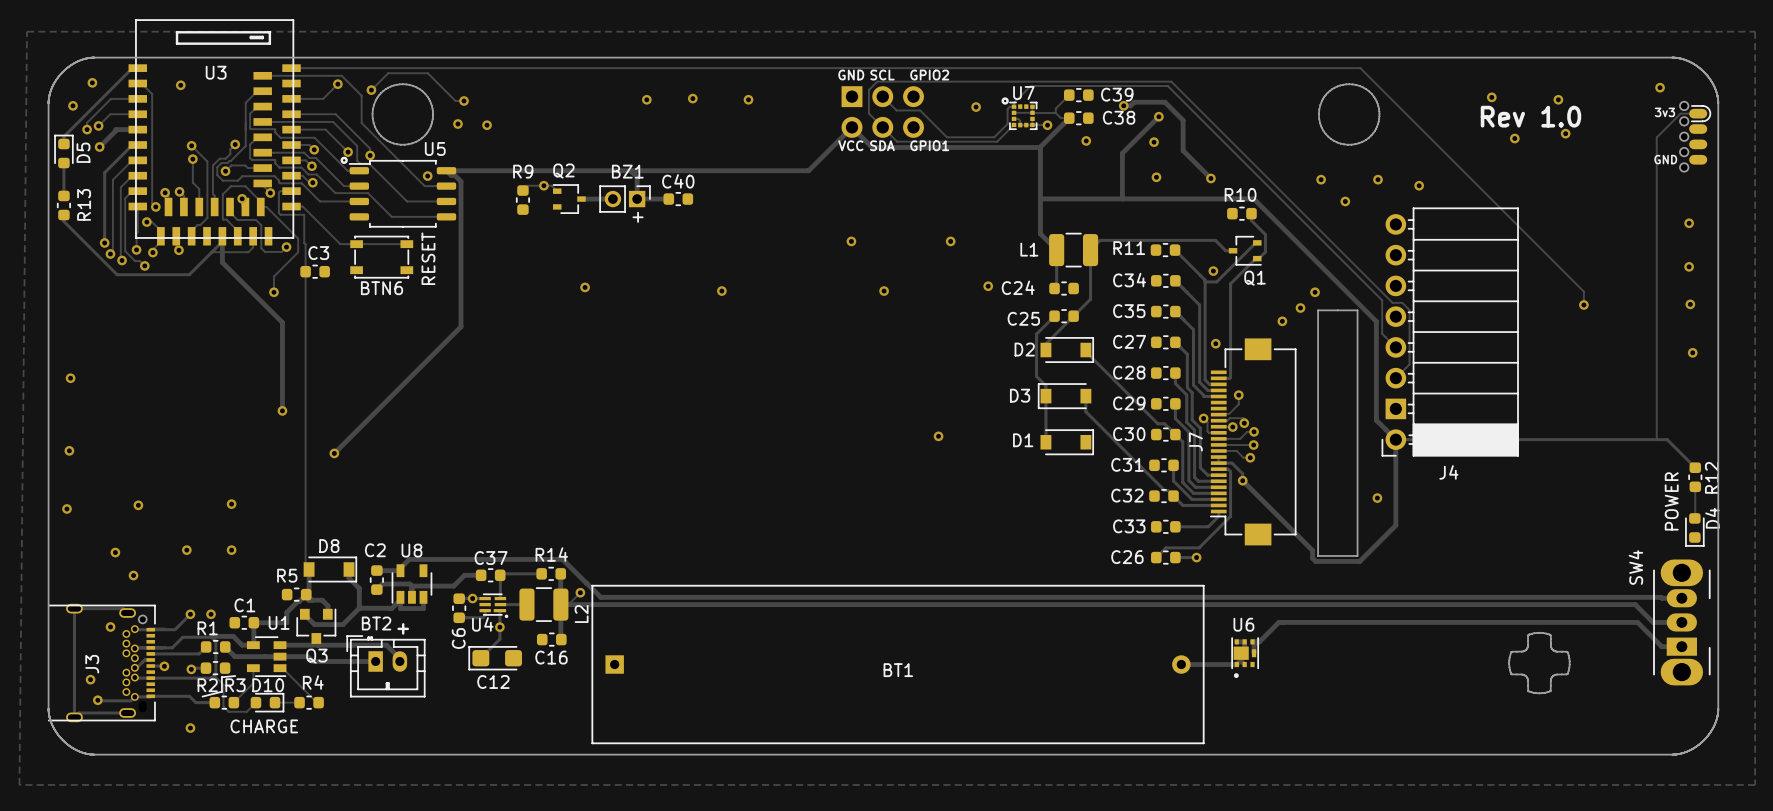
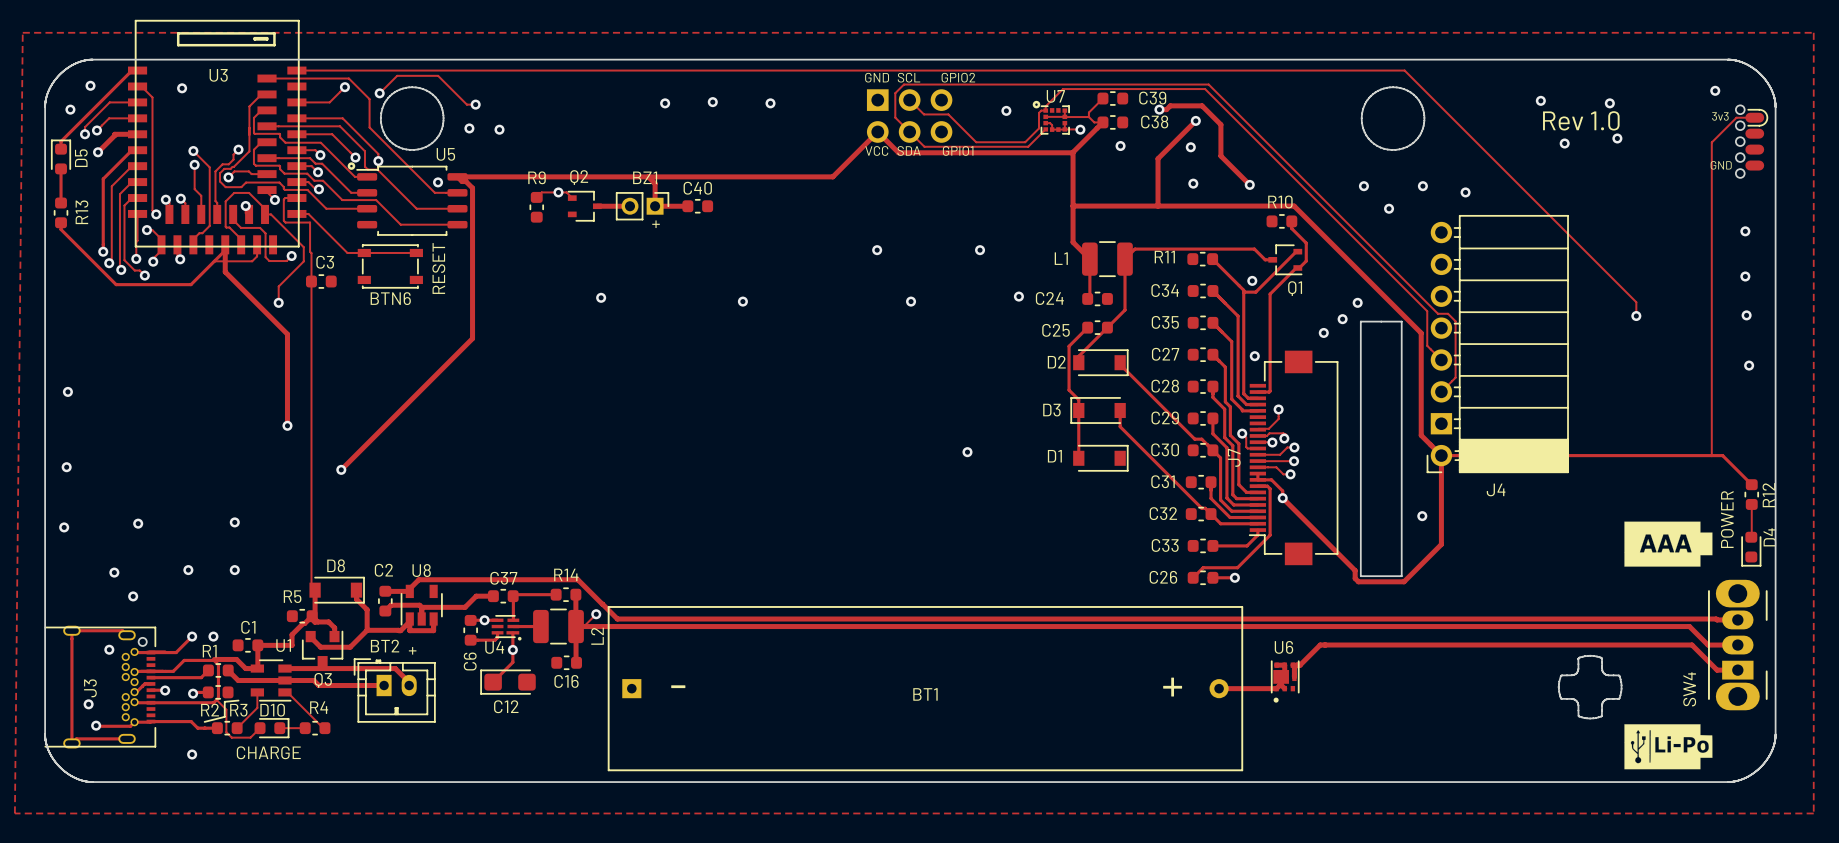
drawing: none -> [1624, 521, 1713, 567]
SW4 name position: SW4 (1635, 567) -> SW4 (1689, 689)
text: none -> - (678, 686)
text: none -> + (1172, 687)
drawing: none -> [1624, 724, 1713, 770]

